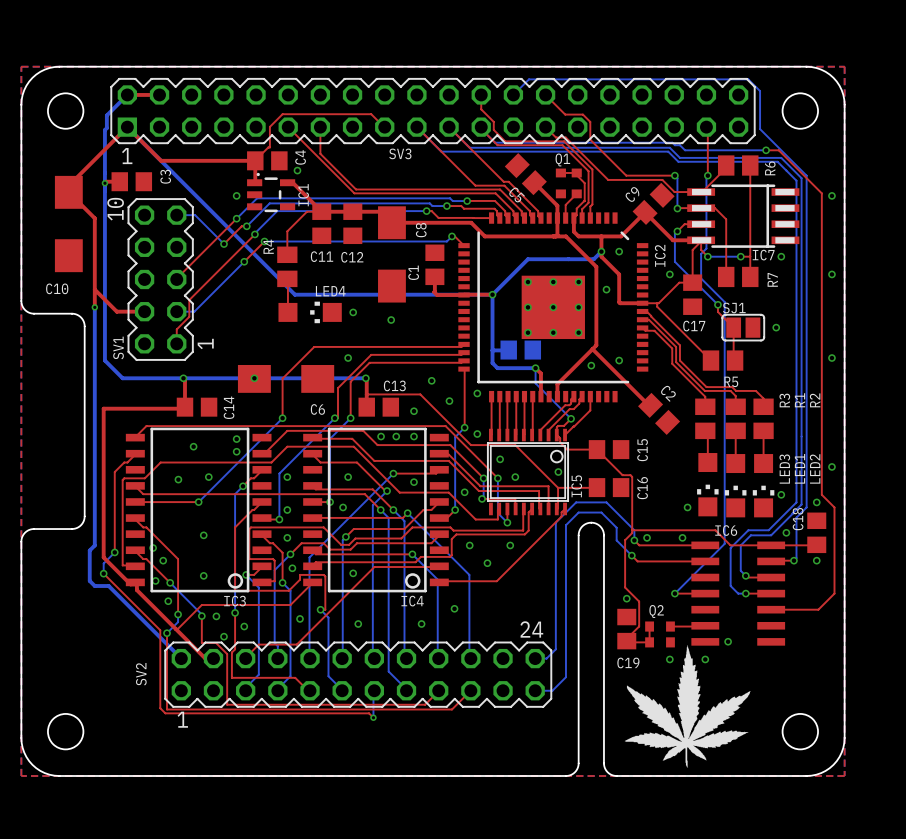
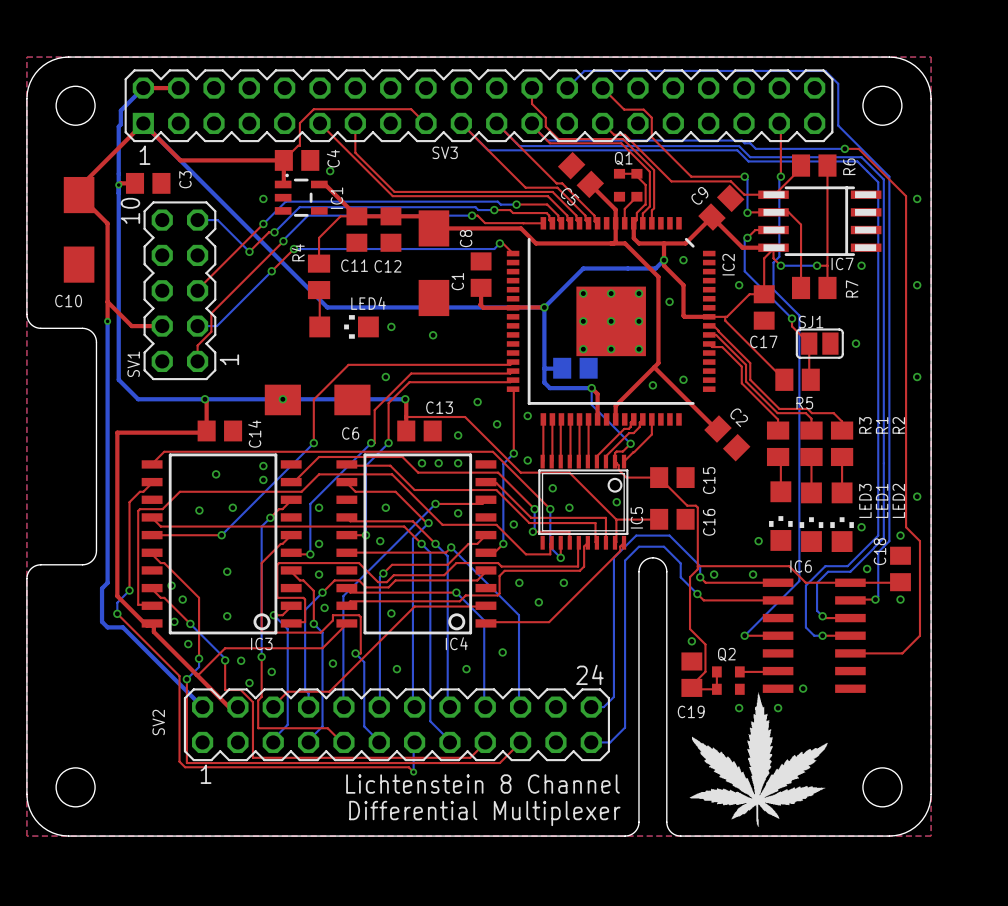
text: none -> Lichtenstein 8 Channel (482, 784)
text: none -> Differential Multiplexer (484, 813)

